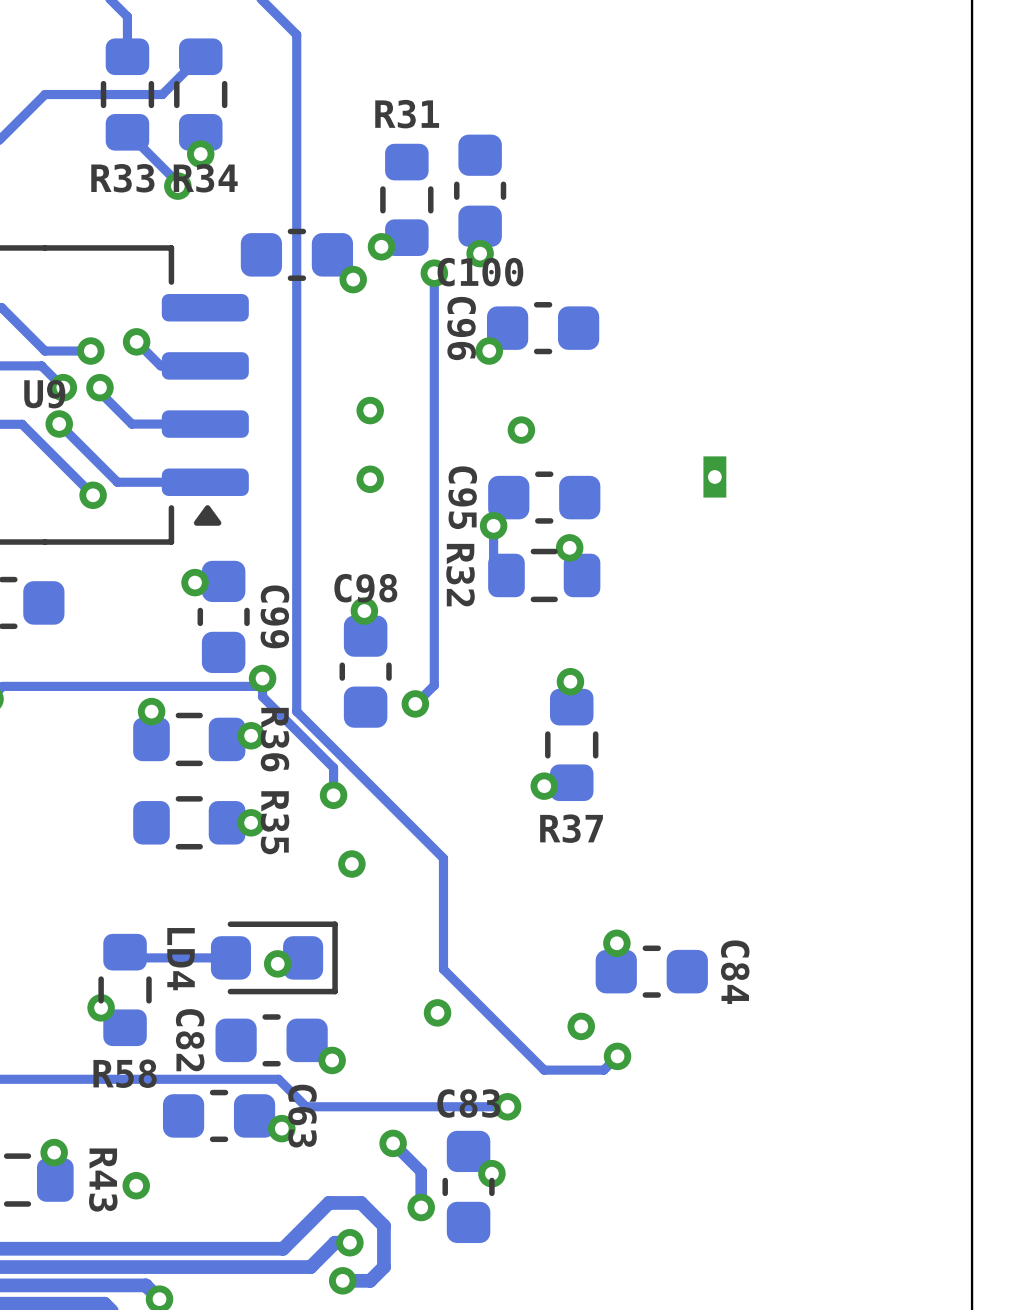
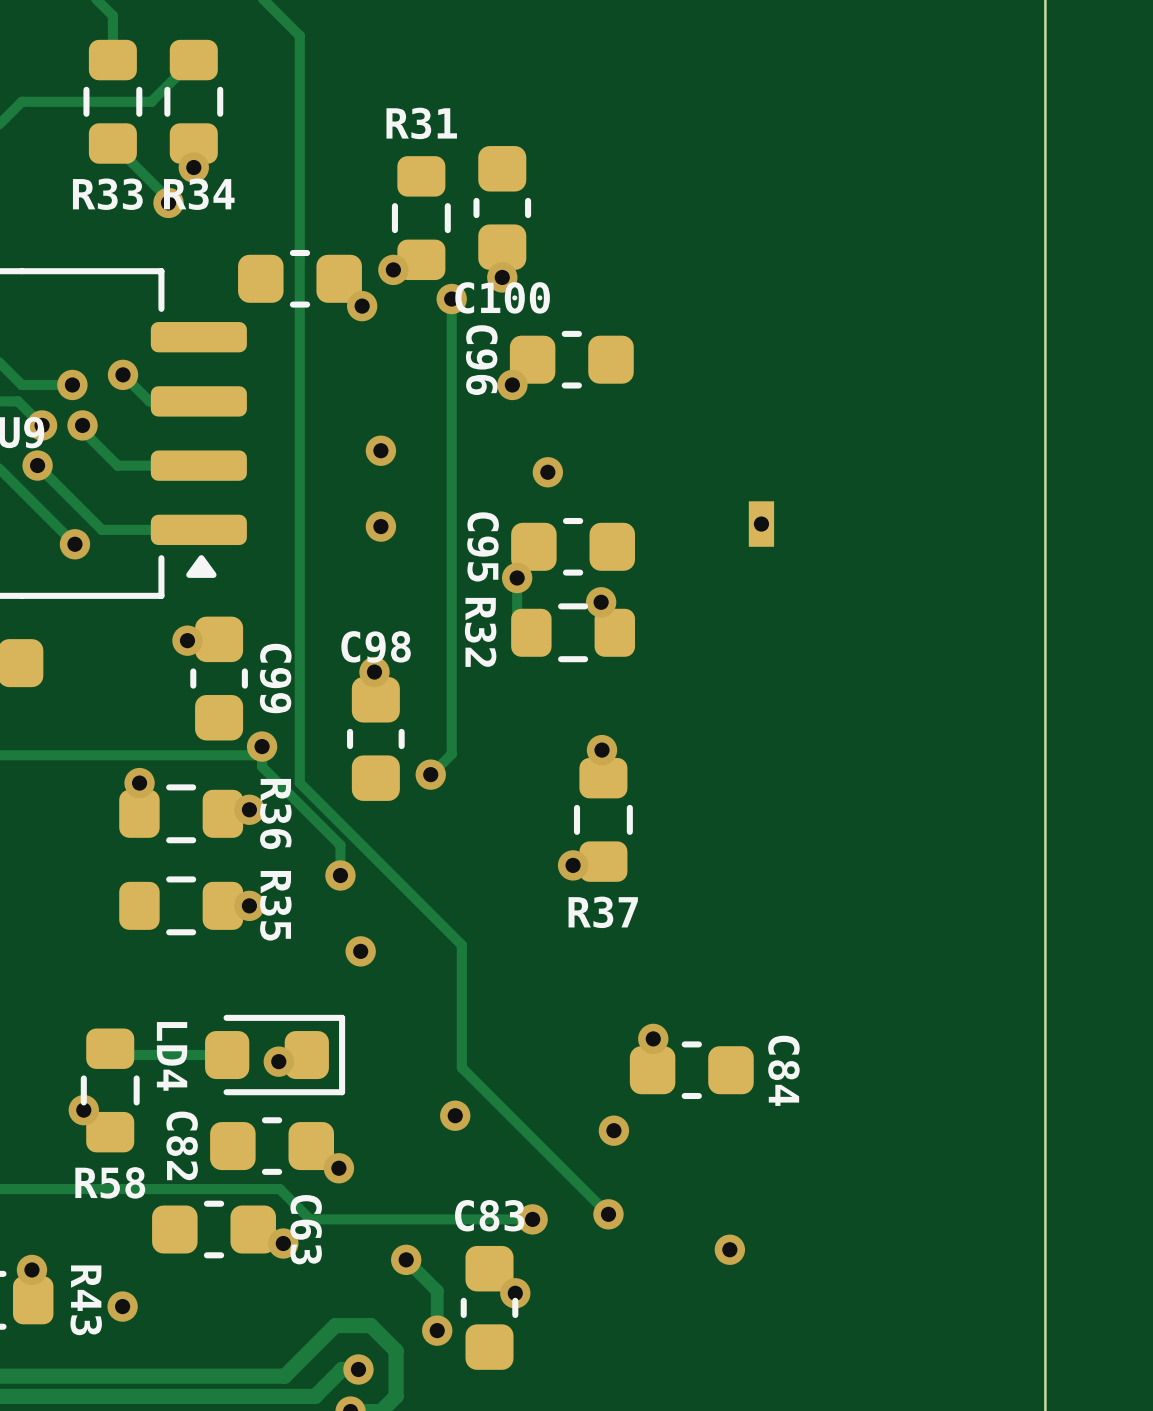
track: (617, 1056) (603, 1070) (544, 1070) -> (608, 1214) (573, 1178)
via: (617, 1056) -> none
via: none -> (608, 1214)
via: none -> (729, 1249)

